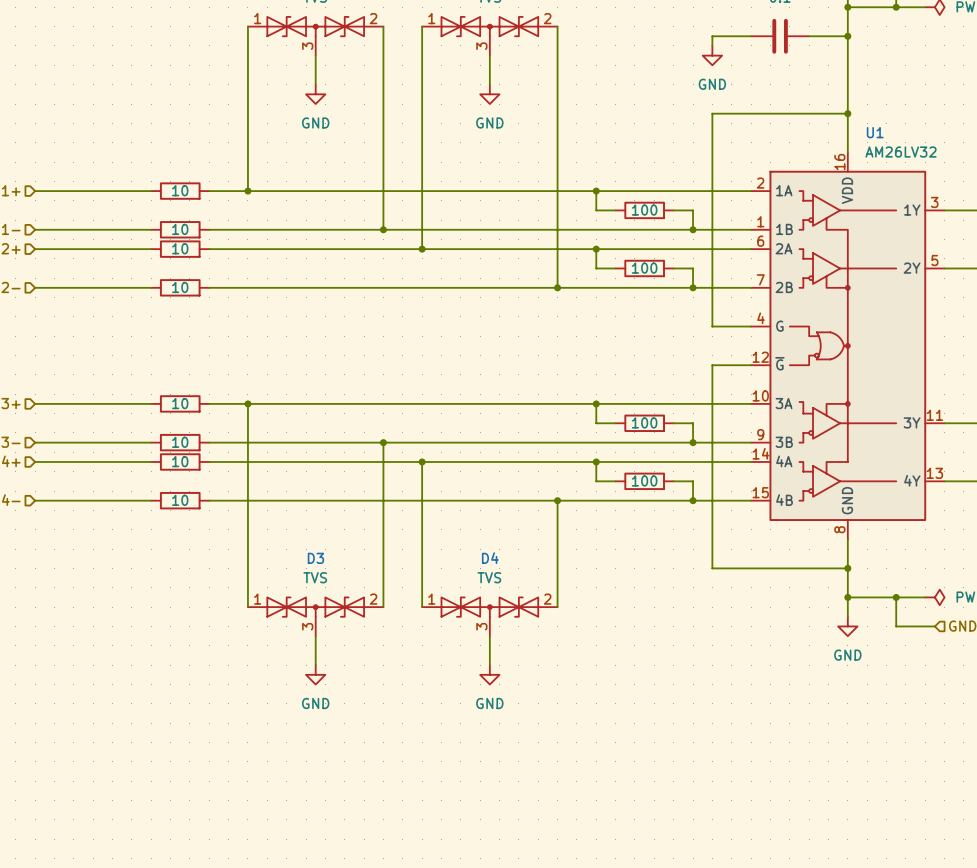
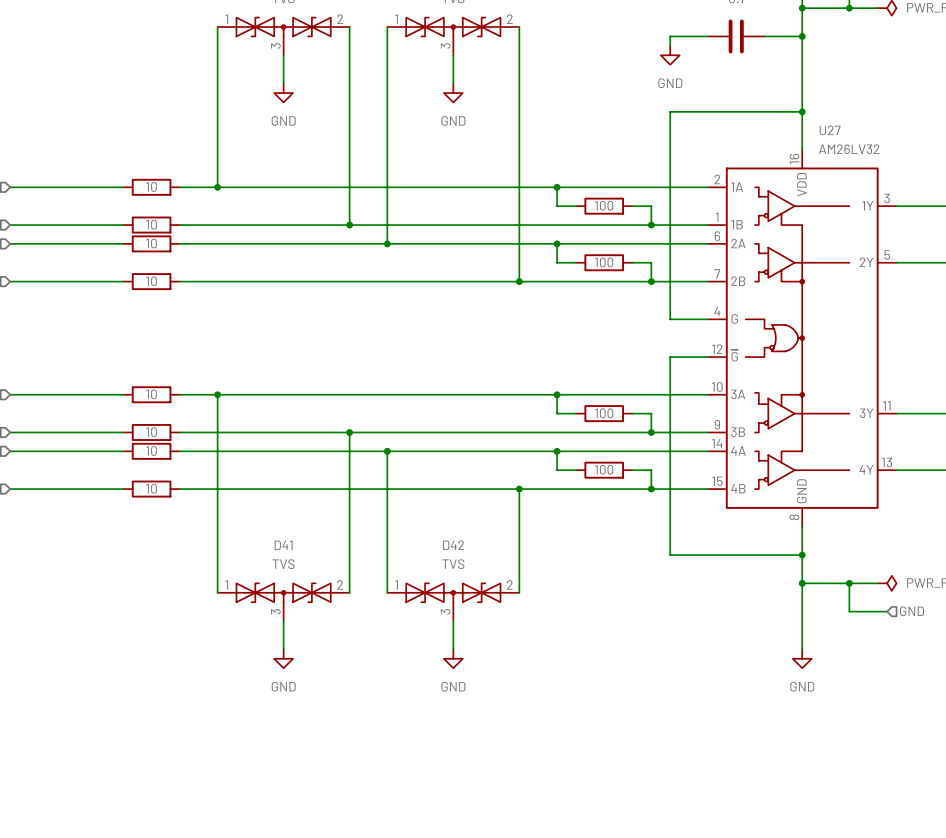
U1 name: U1 (875, 132) -> U27 (830, 130)
D3 name: D3 (315, 558) -> D41 (283, 545)
D4 name: D4 (490, 558) -> D42 (453, 545)
wire: none -> (802, 602) (802, 649)
power symbol position: GND (847, 626) -> GND (802, 658)

